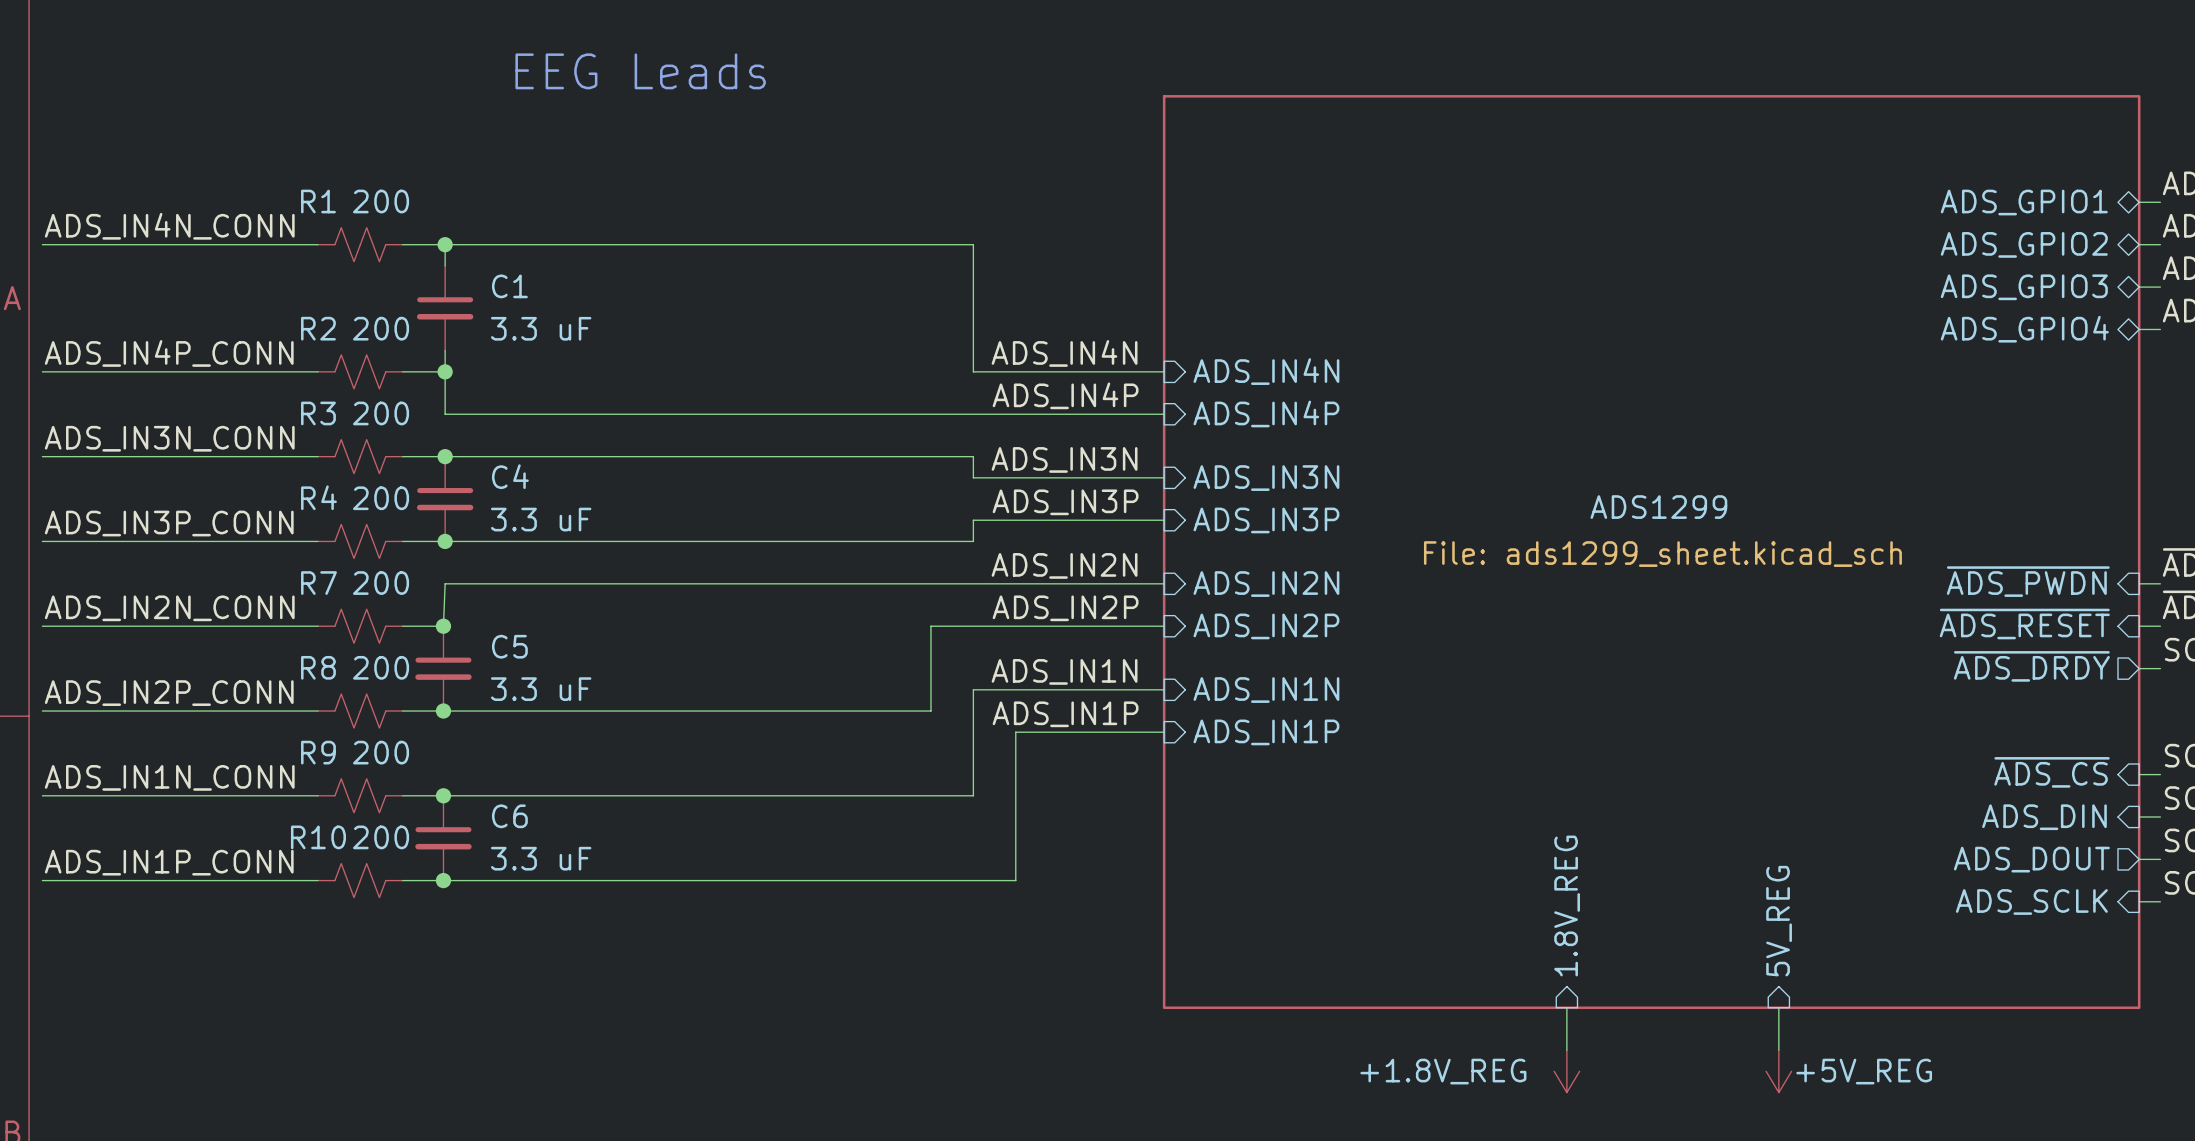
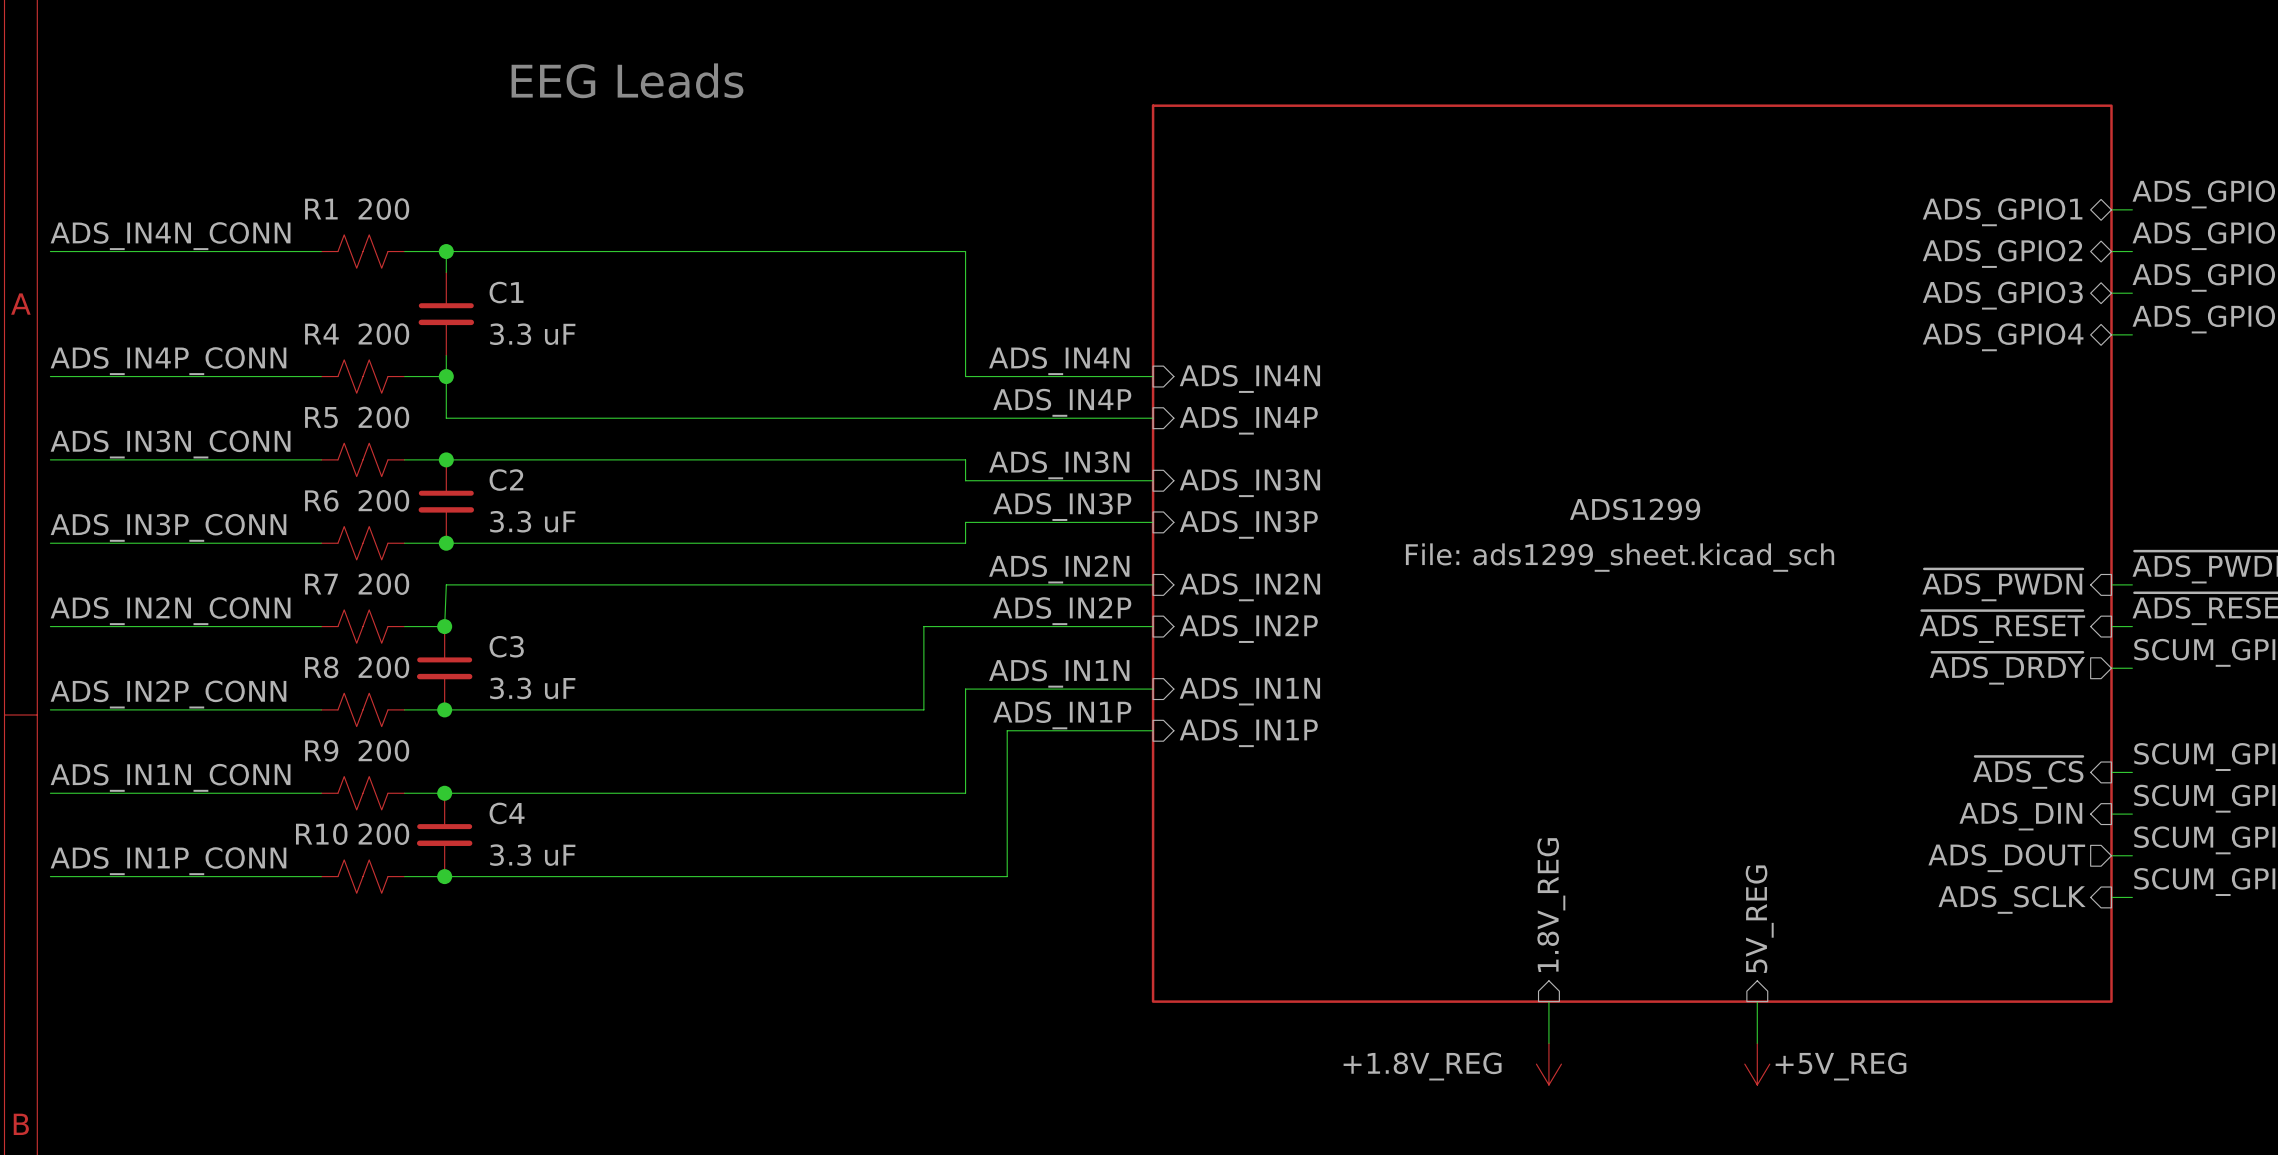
R2 name: R2 (318, 328) -> R4 (321, 334)
R3 name: R3 (318, 413) -> R5 (321, 417)
C4 name: C4 (510, 476) -> C2 (506, 480)
R4 name: R4 (318, 497) -> R6 (321, 500)
C5 name: C5 (509, 646) -> C3 (506, 646)
C6 name: C6 (509, 816) -> C4 (507, 813)

